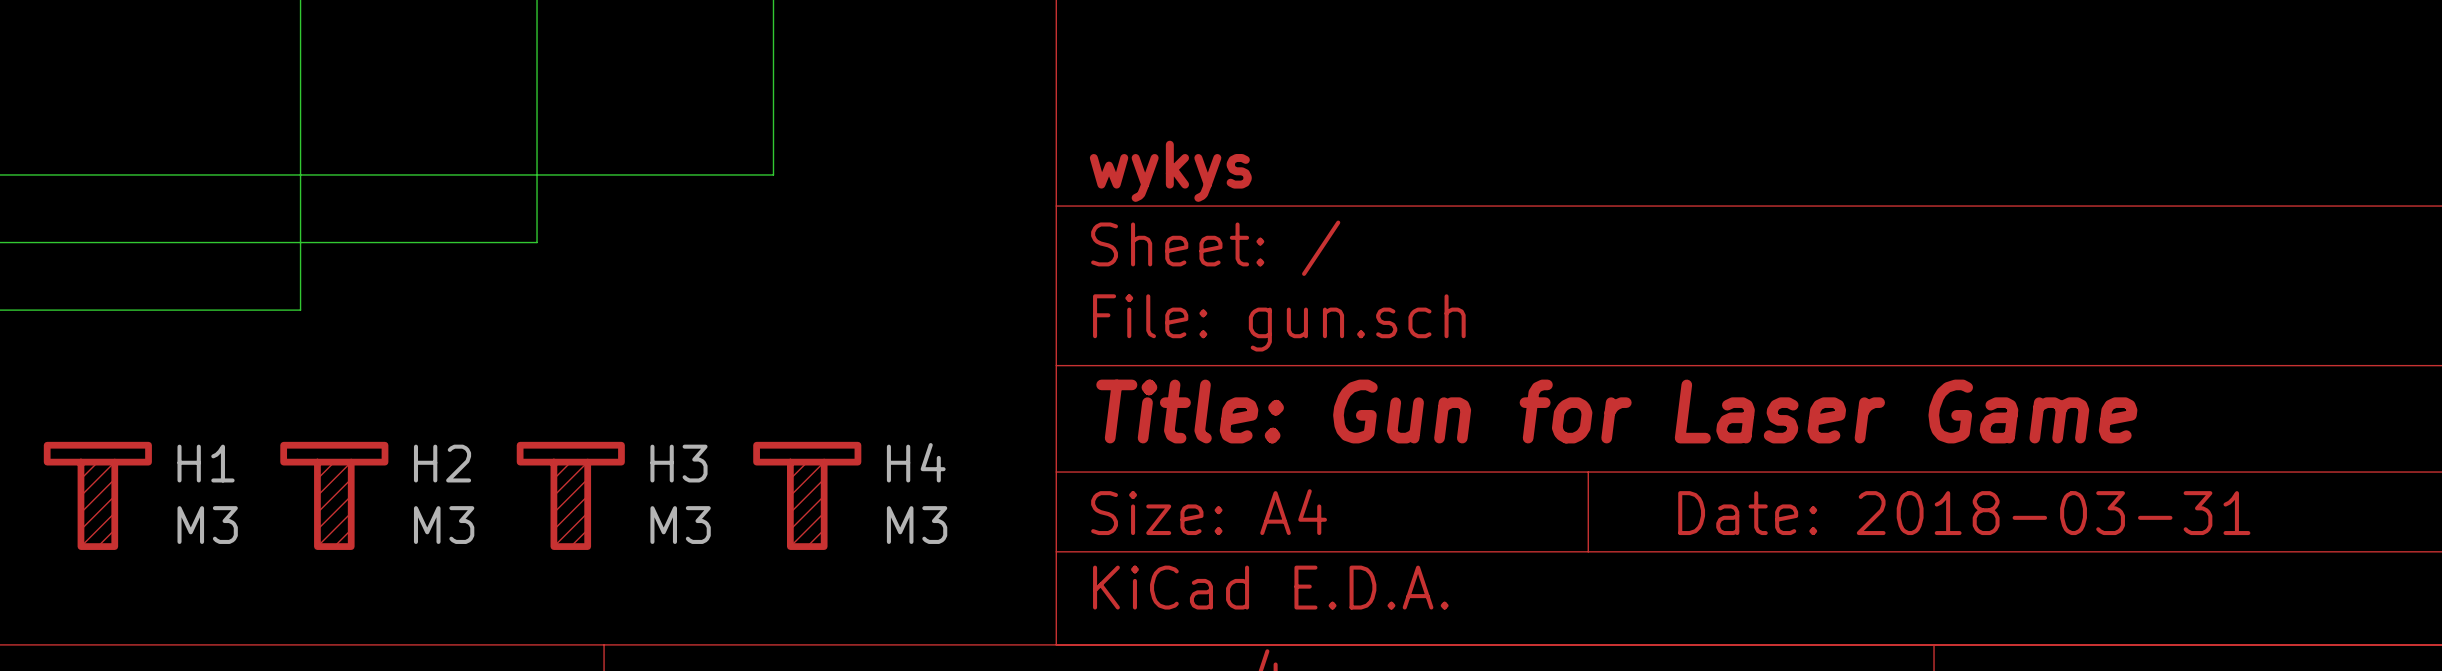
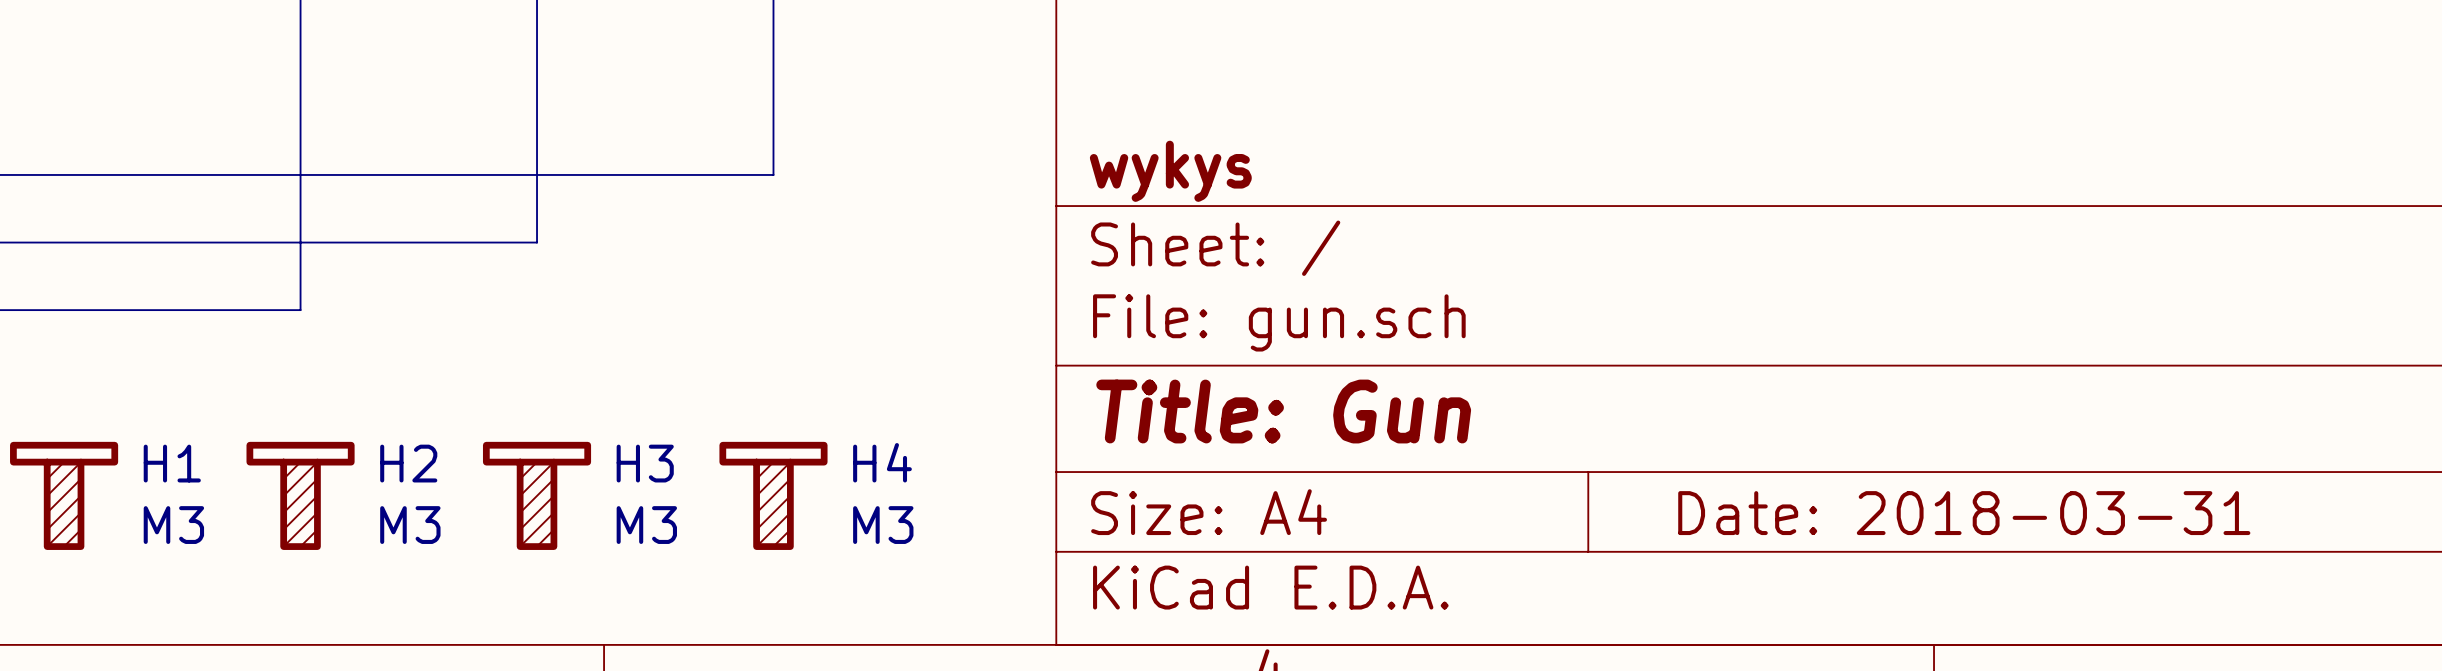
title block: Title: Gun for Laser Game (1616, 411) -> Title: Gun (1283, 411)
H1 position: (97, 495) -> (64, 495)
H2 position: (334, 495) -> (300, 495)
H3 position: (570, 495) -> (537, 495)
H4 position: (807, 495) -> (773, 495)

